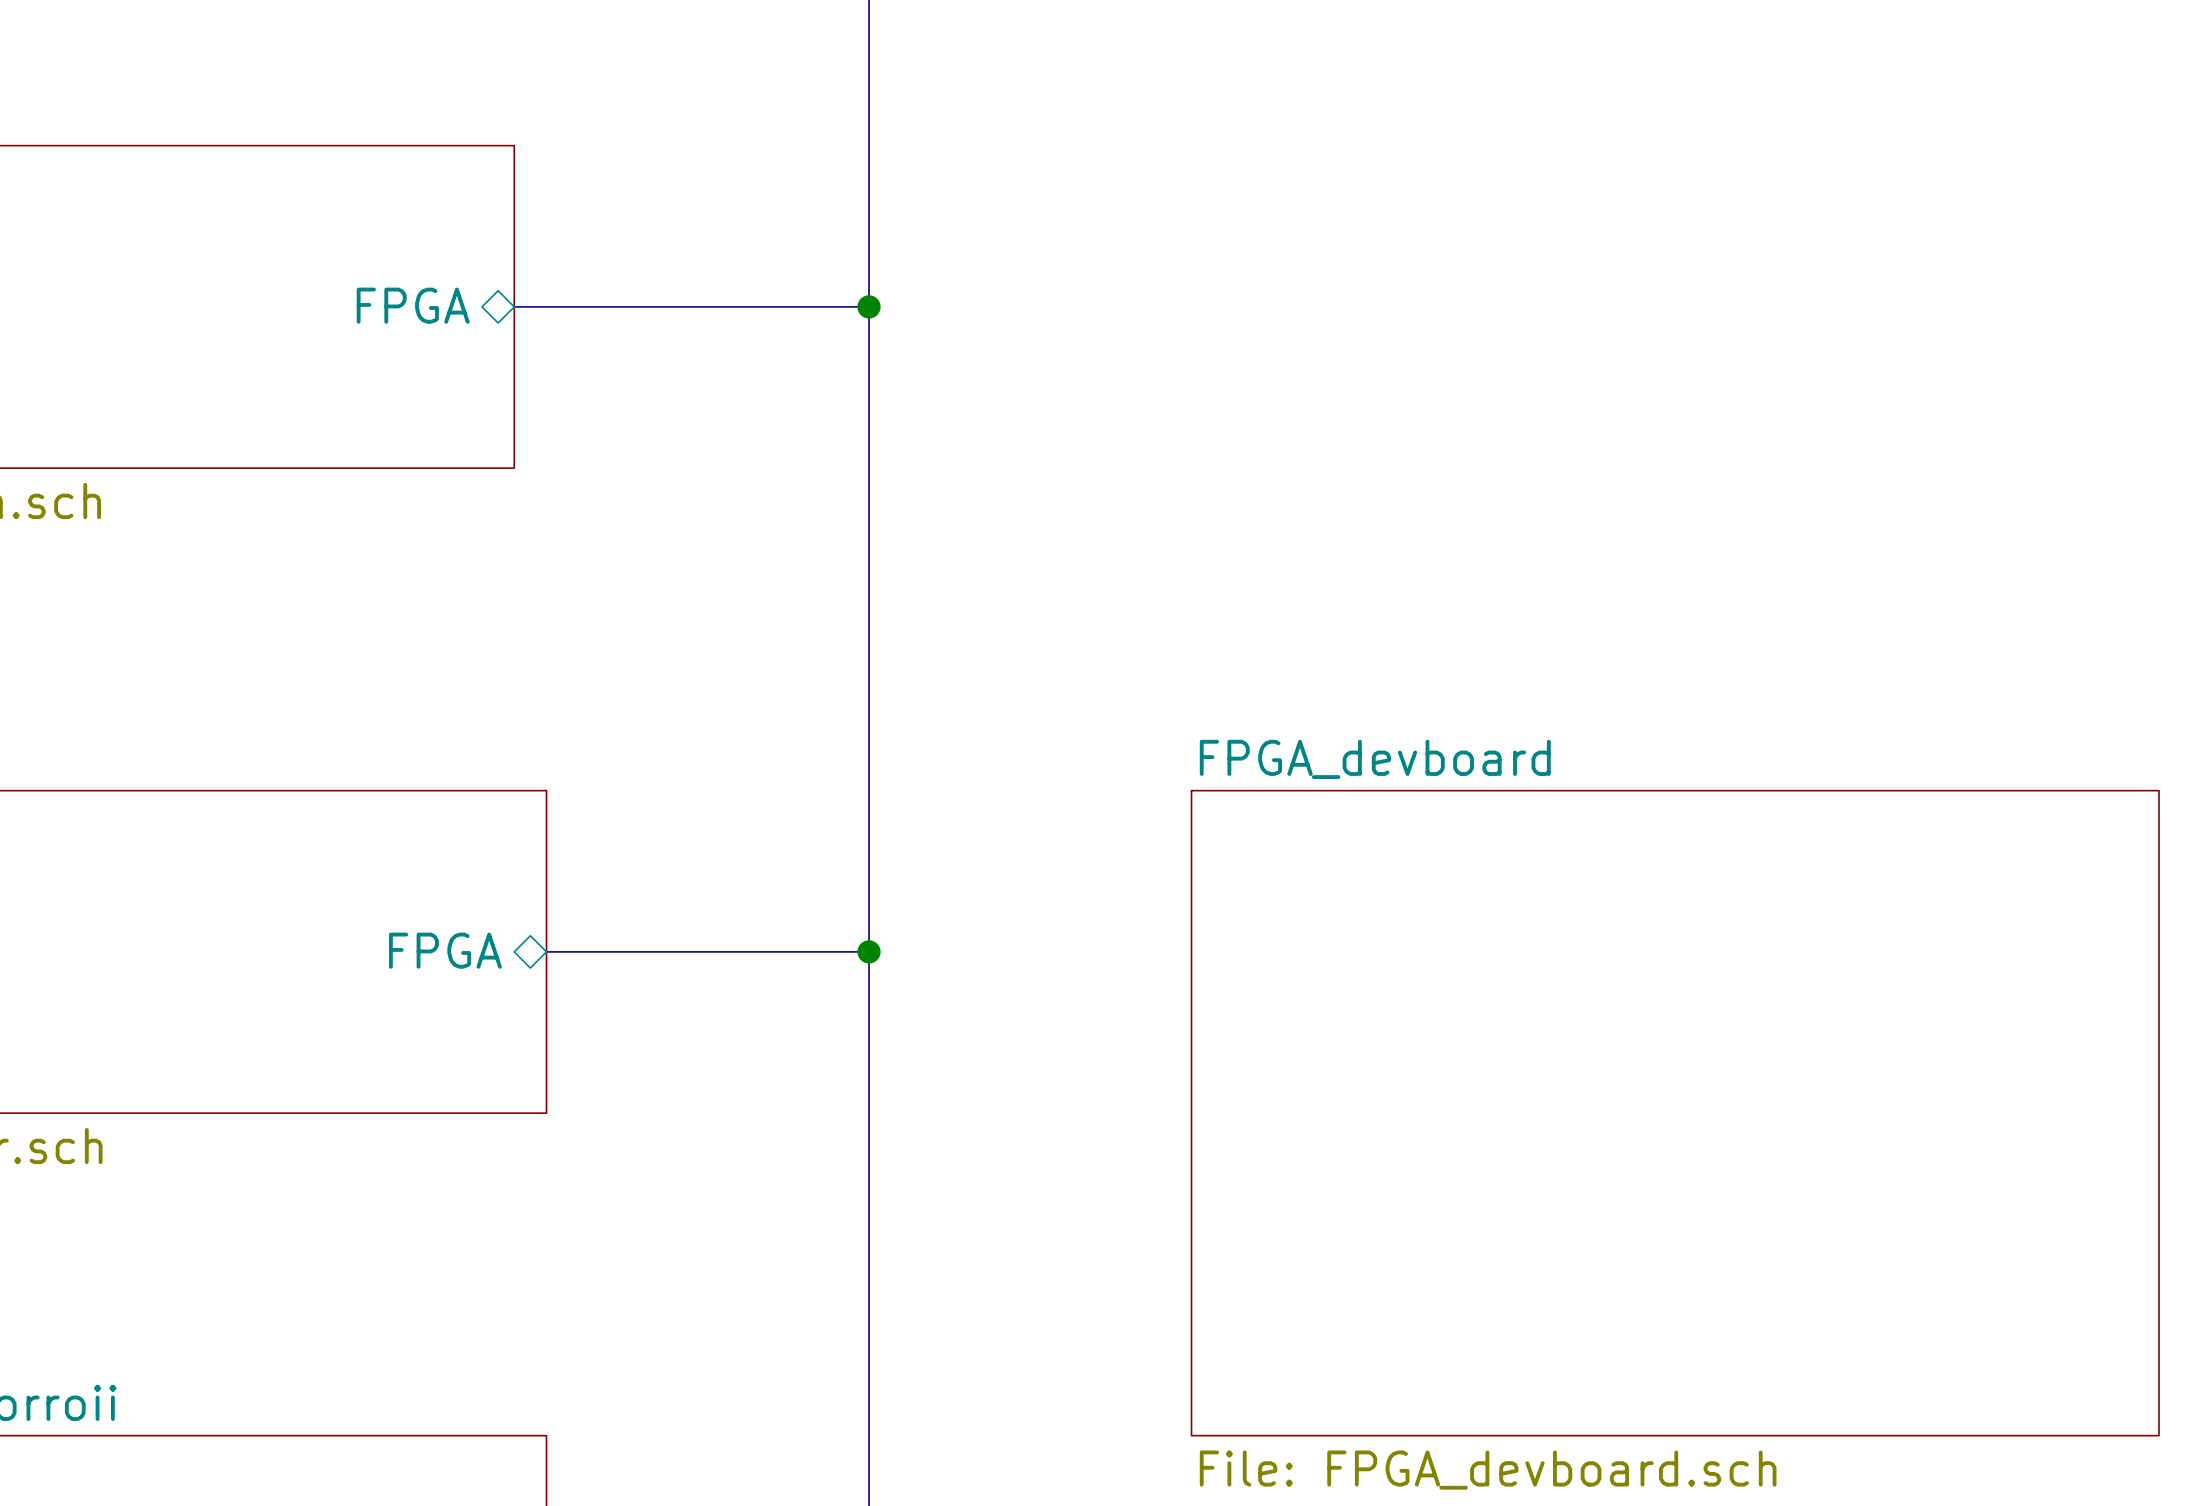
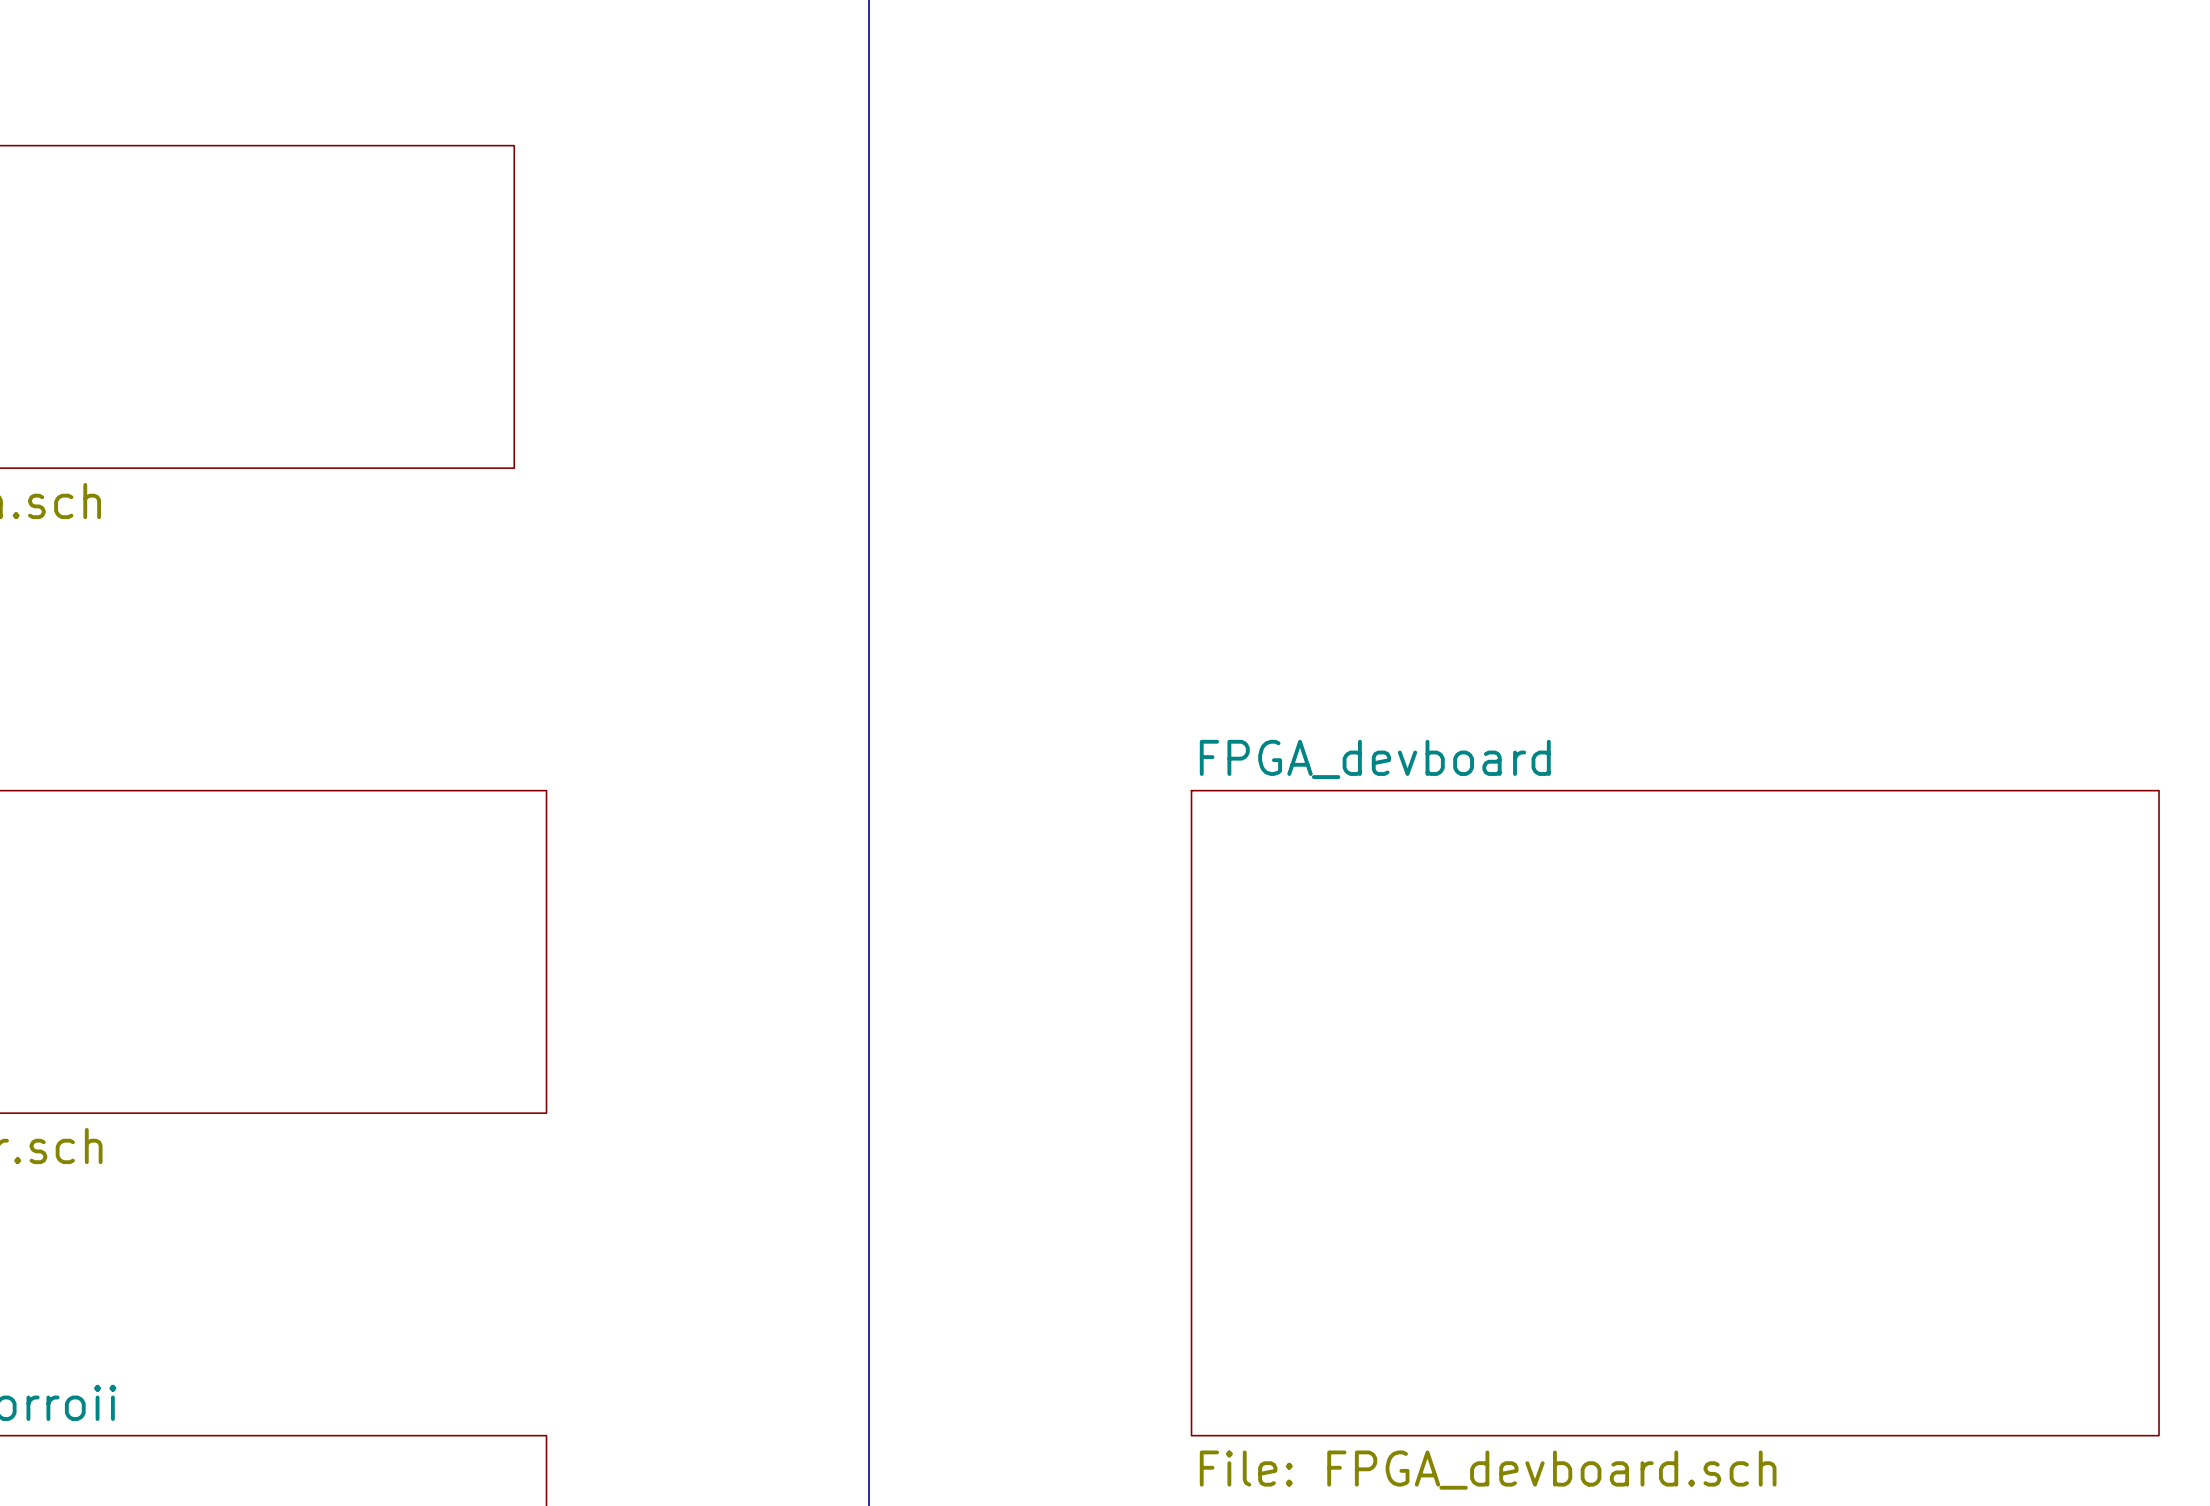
sheet pin: FPGA (413, 305) -> none
bus: (514, 306) (869, 306) -> none
junction: (869, 306) -> none
sheet pin: FPGA (445, 950) -> none
bus: (546, 951) (869, 951) -> none
junction: (869, 951) -> none

